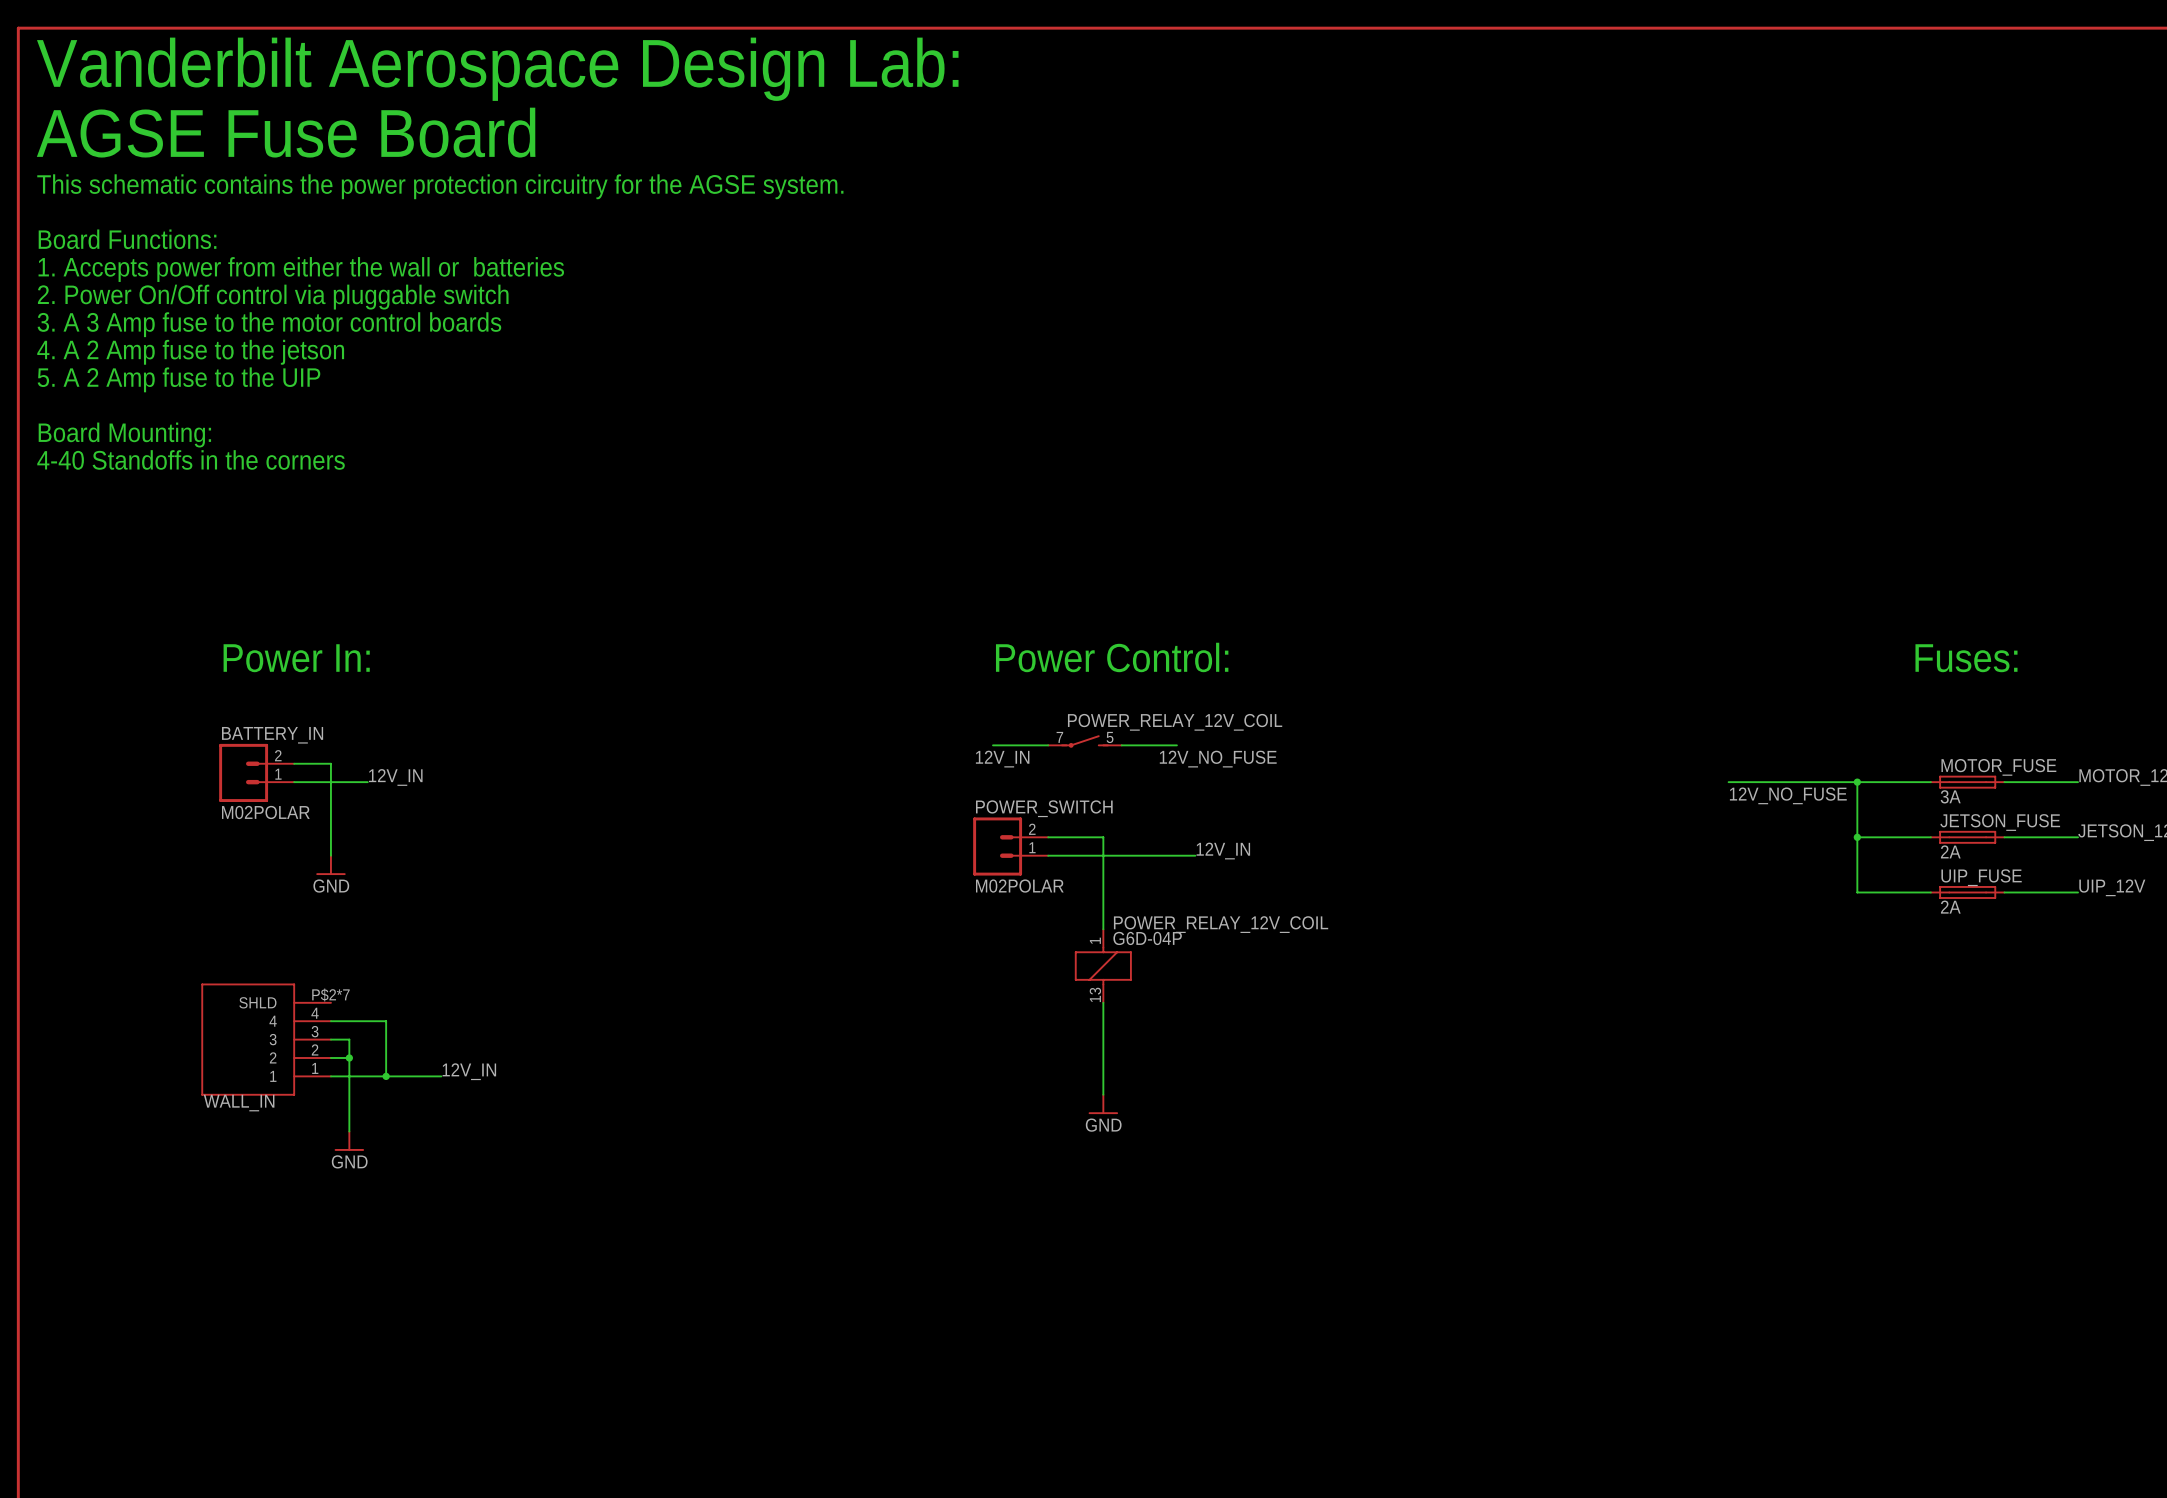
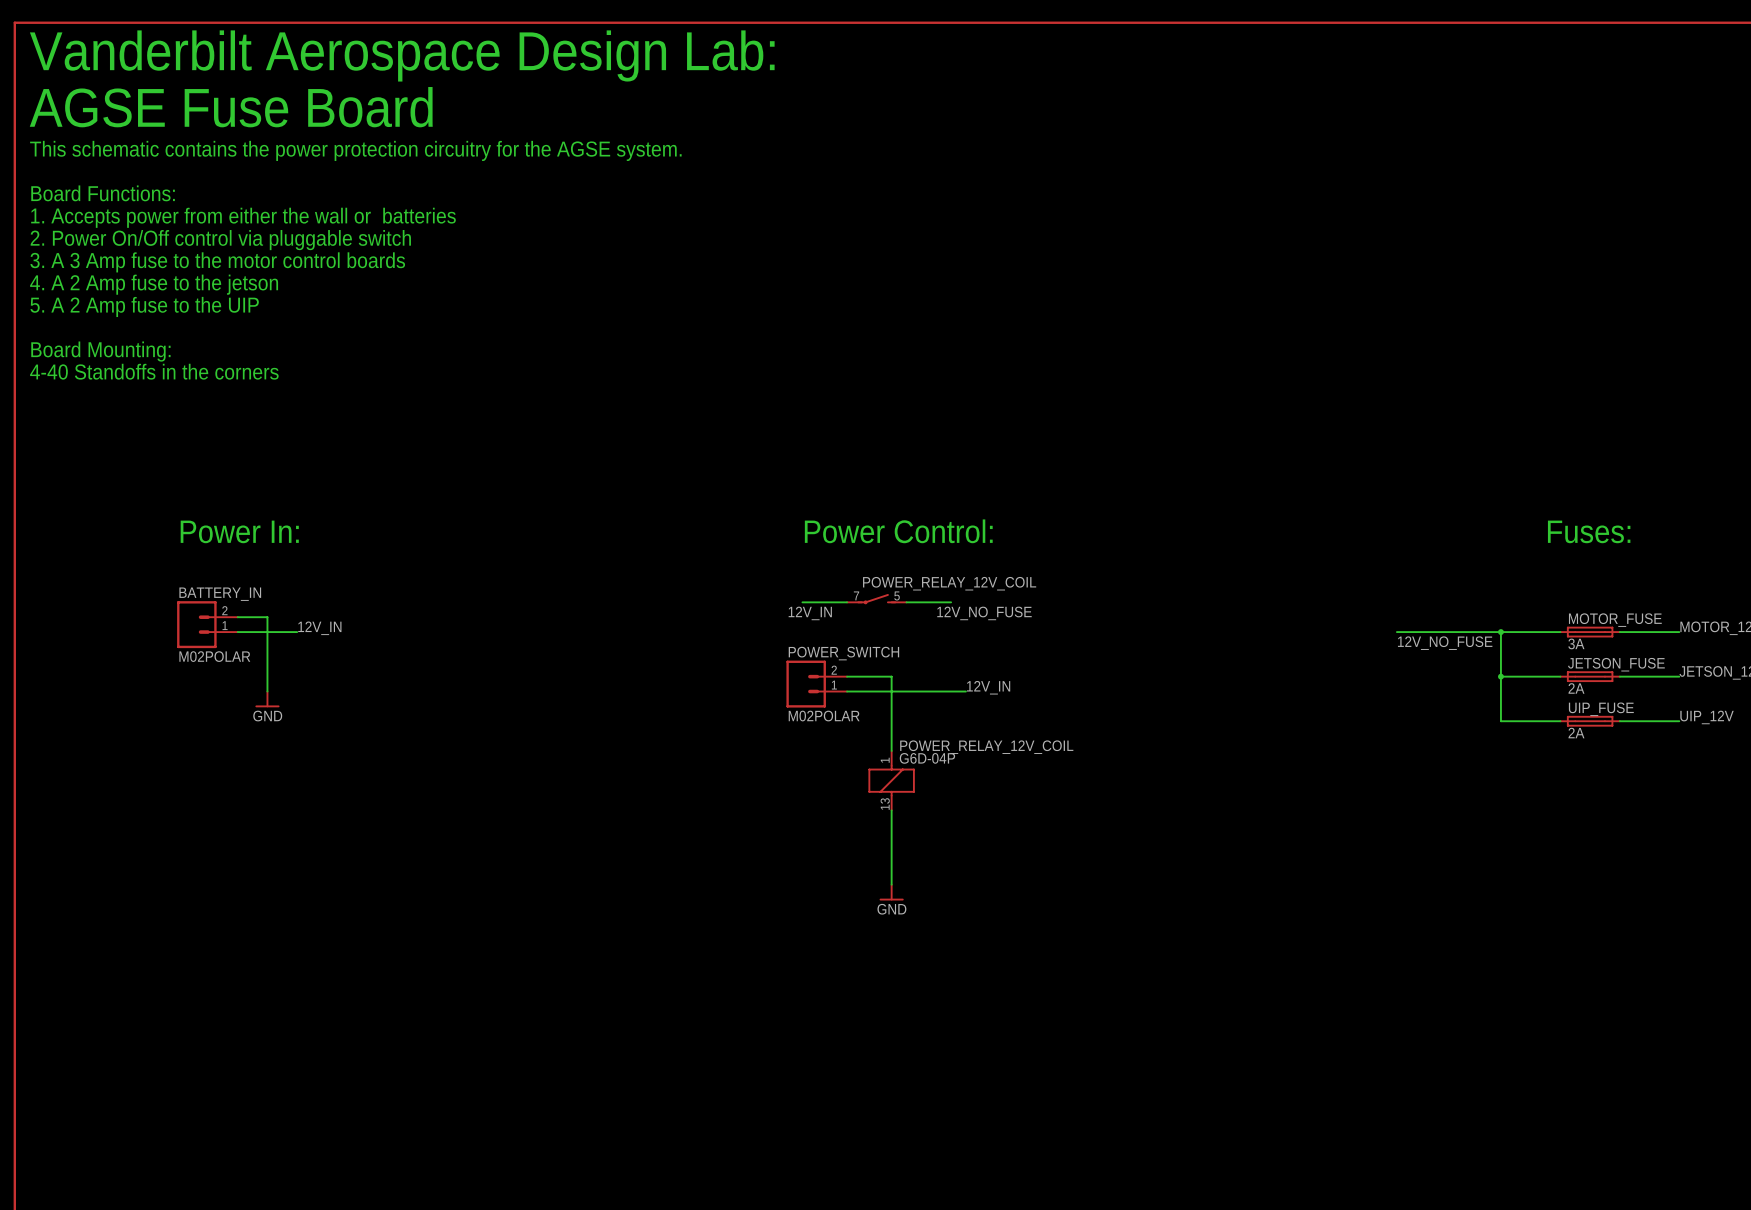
wire: (330, 1021) (386, 1021) (386, 1076) -> none
WALL_IN: (266, 1039) -> none
wire: (330, 1039) (349, 1039) (349, 1131) -> none
wire: (330, 1057) (349, 1057) -> none
junction: (349, 1057) -> none
label: 12V_IN (469, 1071) -> none
wire: (330, 1076) (441, 1076) -> none
junction: (386, 1076) -> none
power symbol: GND (349, 1141) -> none

